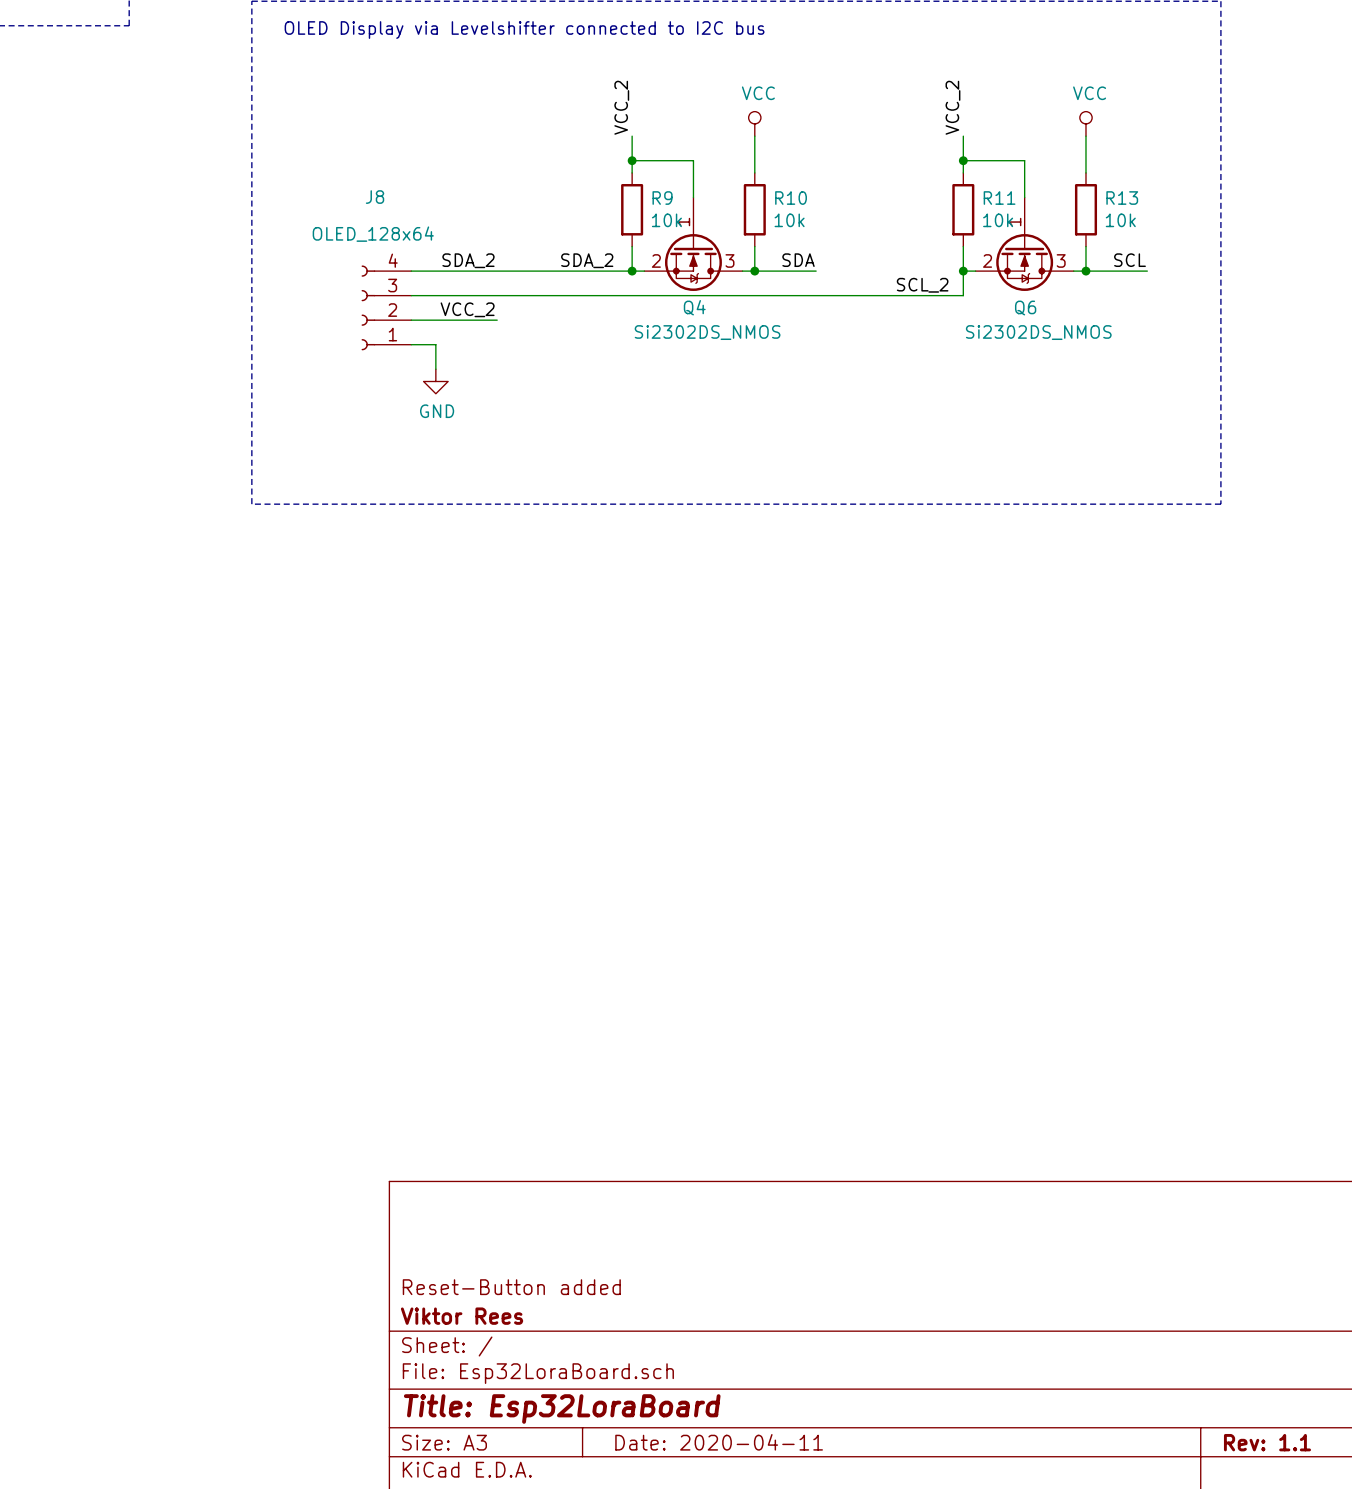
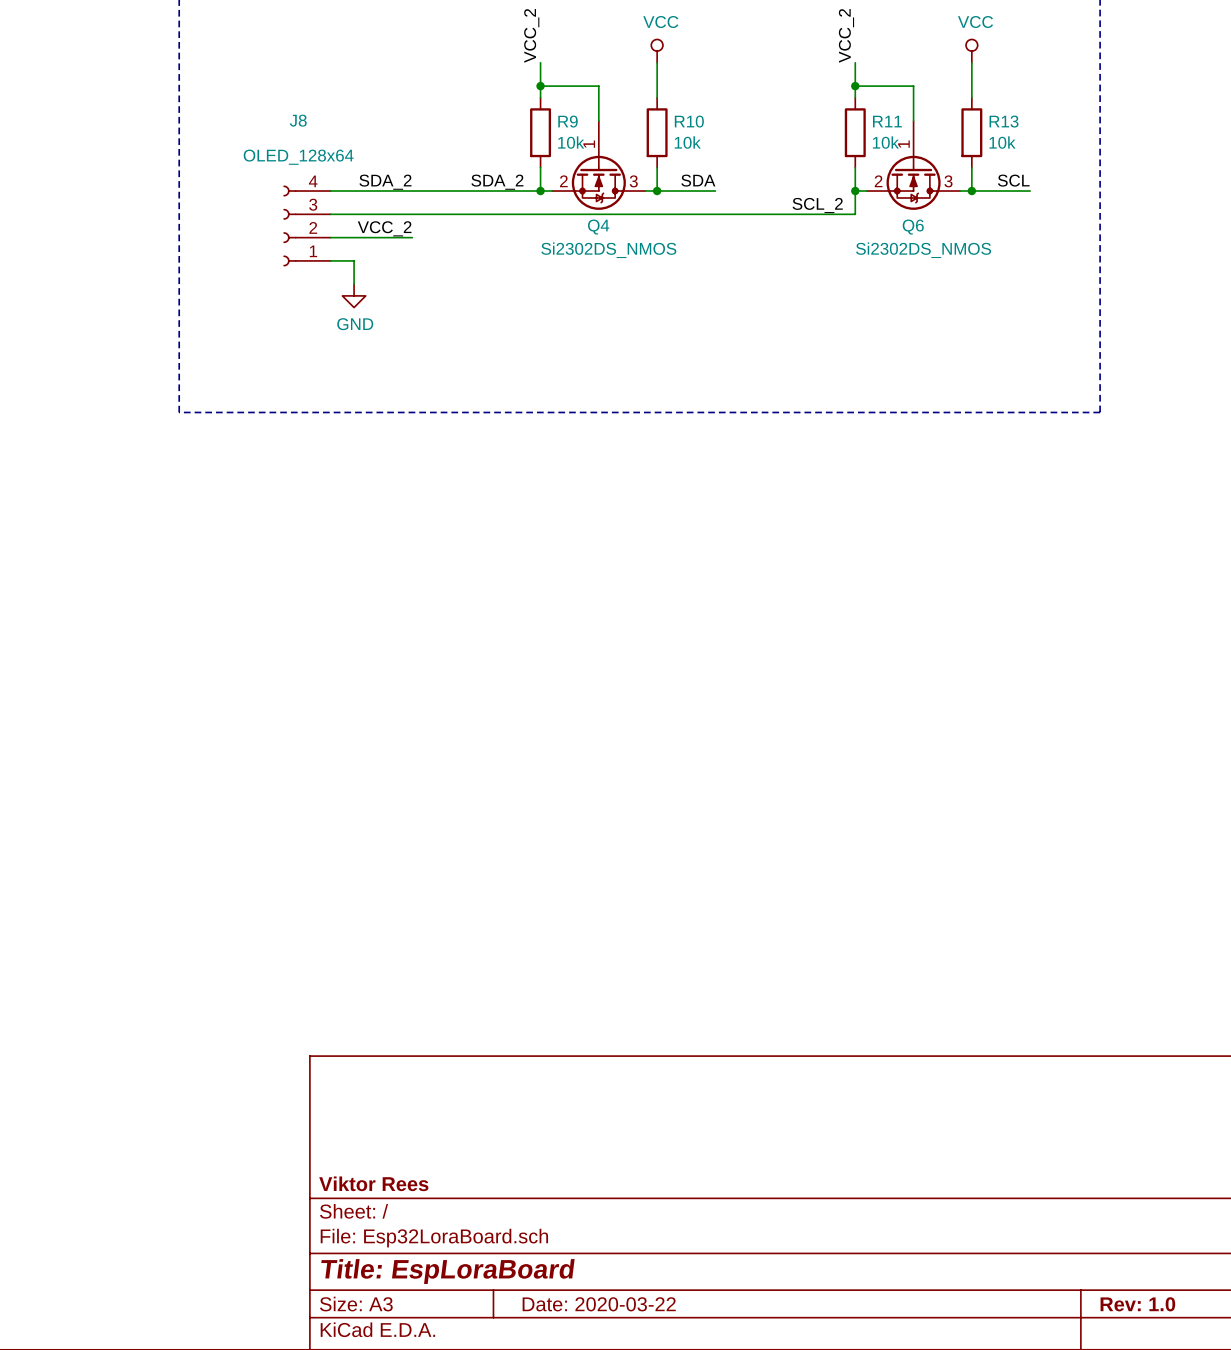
title block: Reset-Button added (511, 1287) -> none
title block: Title: Esp32LoraBoard (562, 1409) -> Title: EspLoraBoard (447, 1271)
title block: Date: 2020-04-11 (719, 1442) -> Date: 2020-03-22 (599, 1304)
title block: Rev: 1.1 (1267, 1442) -> Rev: 1.0 (1137, 1304)

